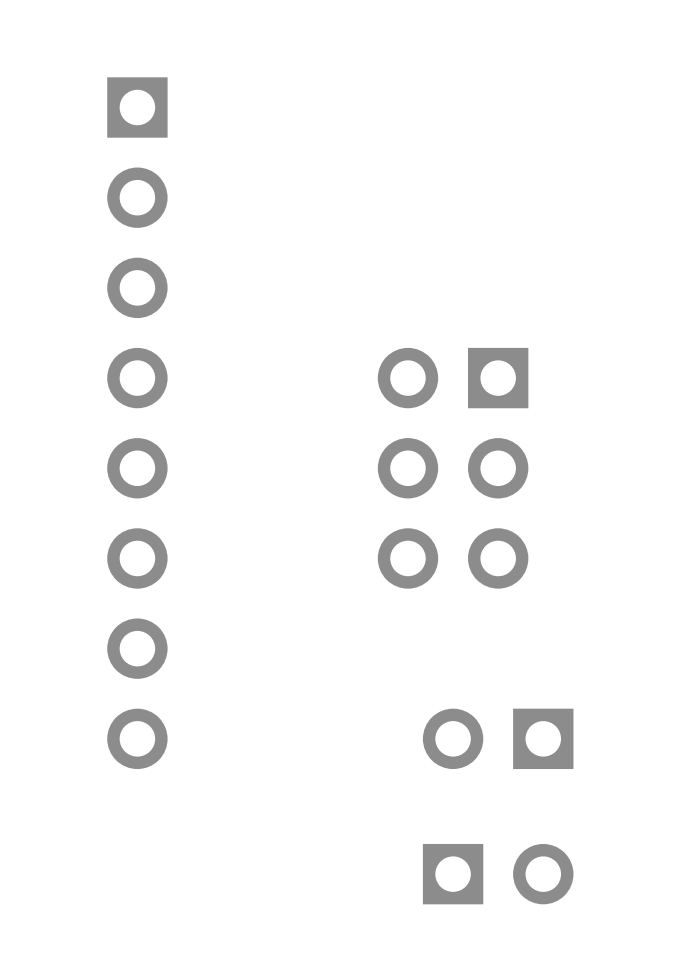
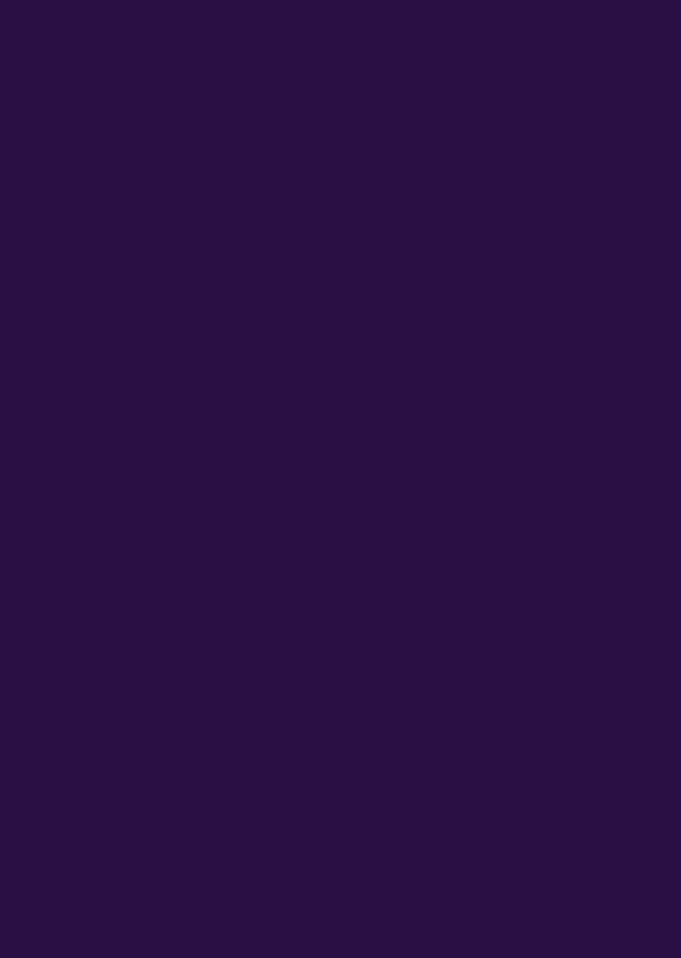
part: (137, 423) -> none
part: (453, 468) -> none
part: (498, 738) -> none
part: (498, 874) -> none

